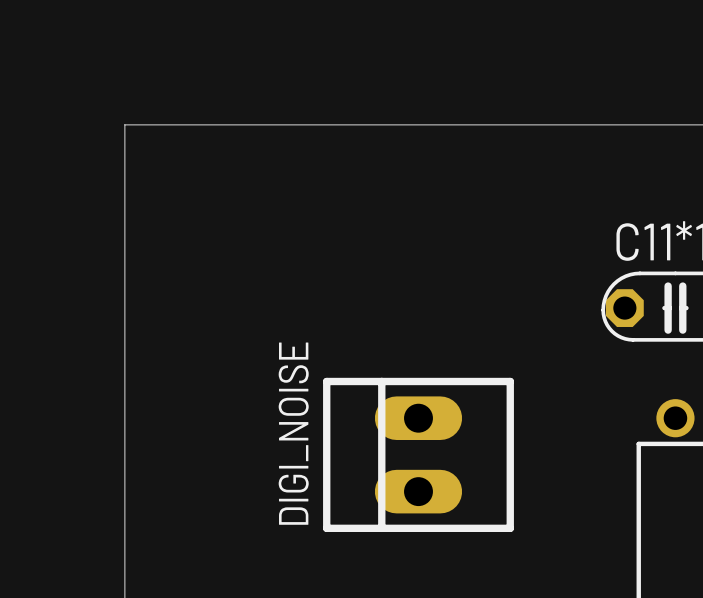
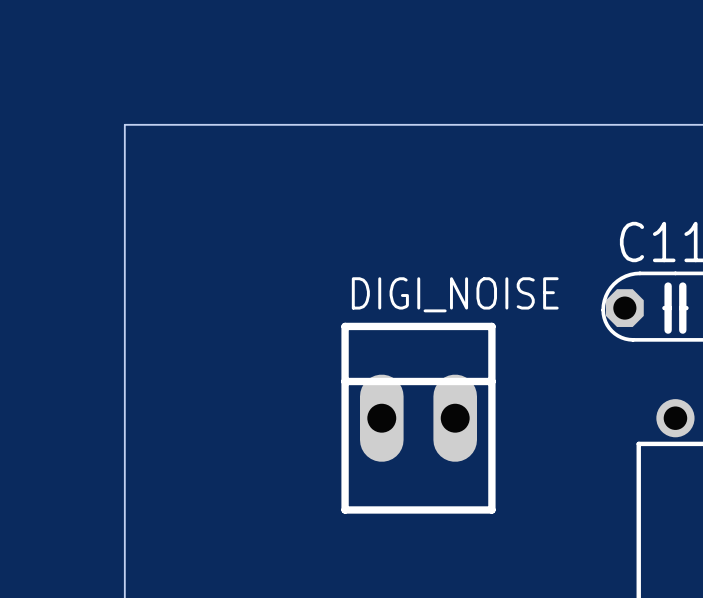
DIGI_NOISE rotation: 0° (418, 454) -> 90° clockwise (418, 418)

